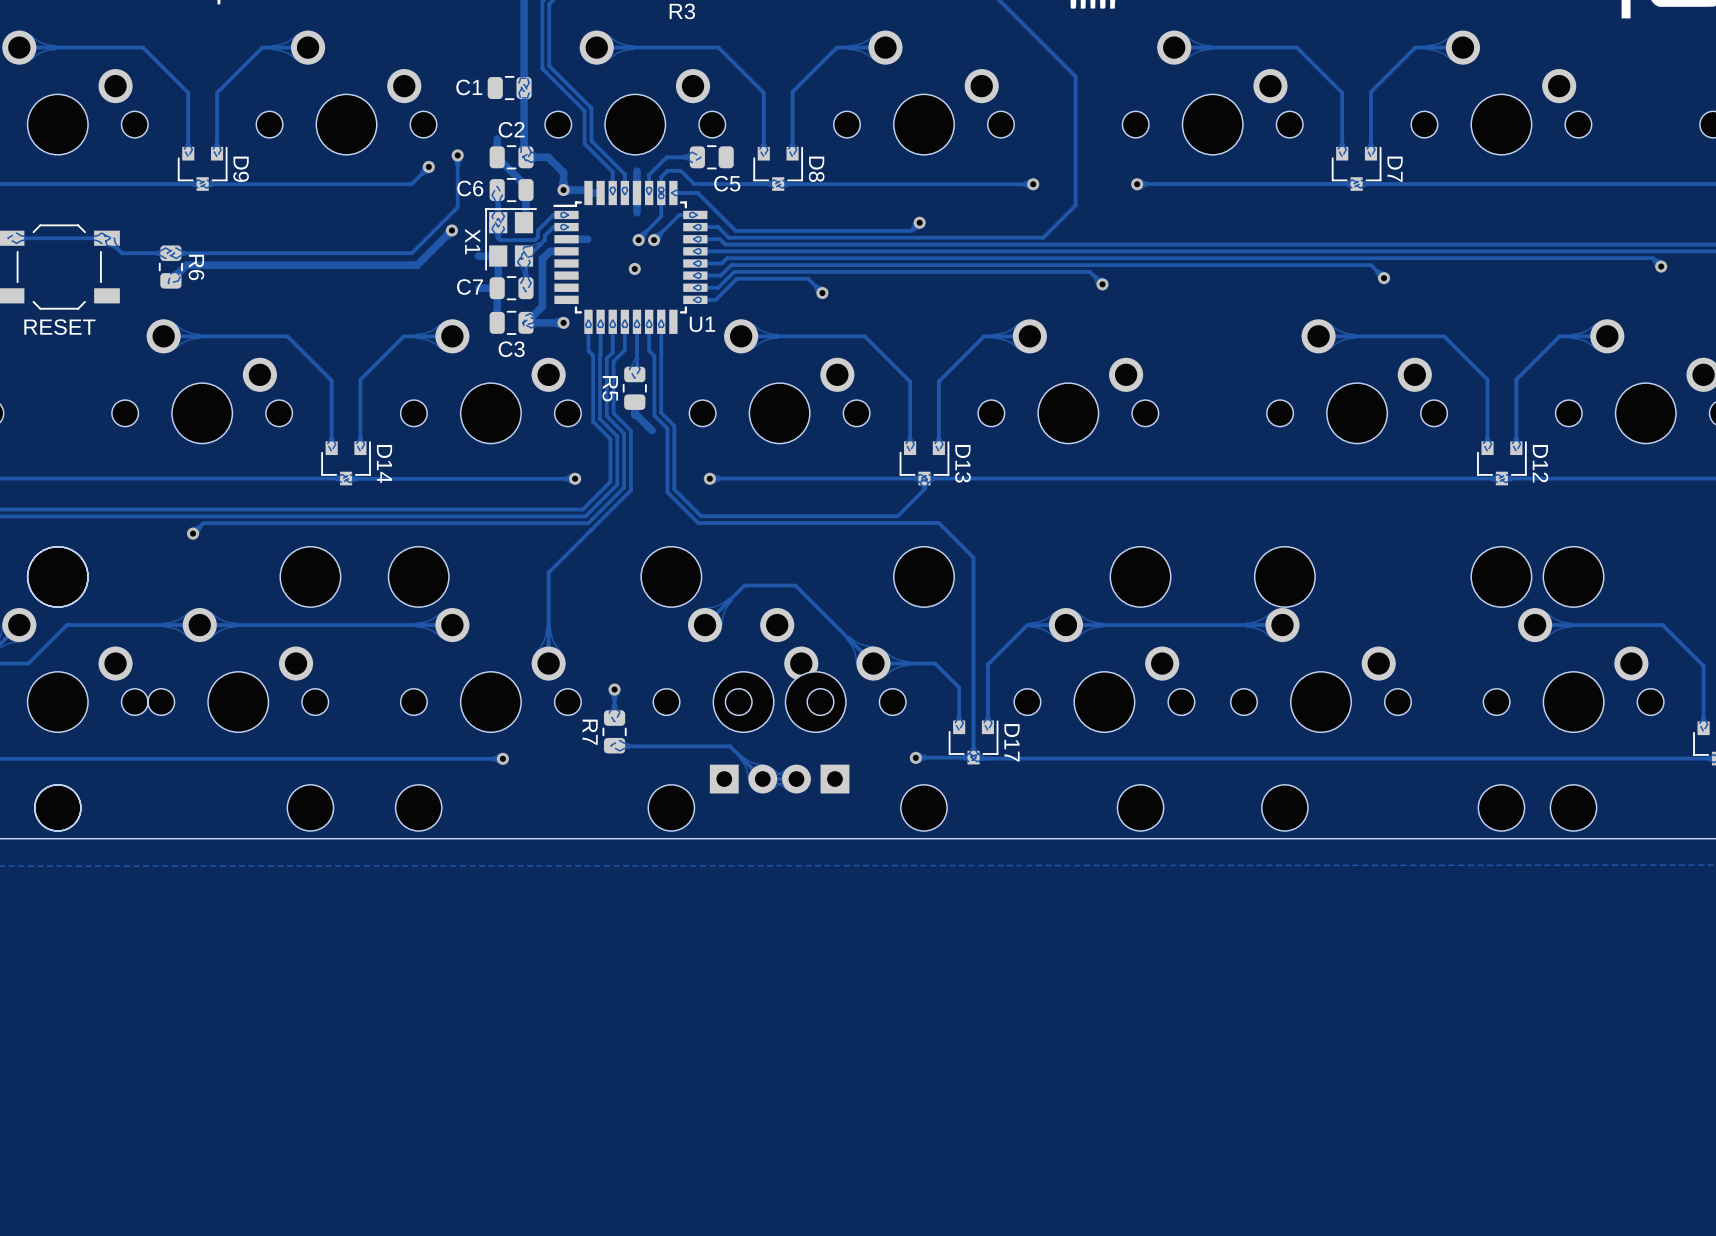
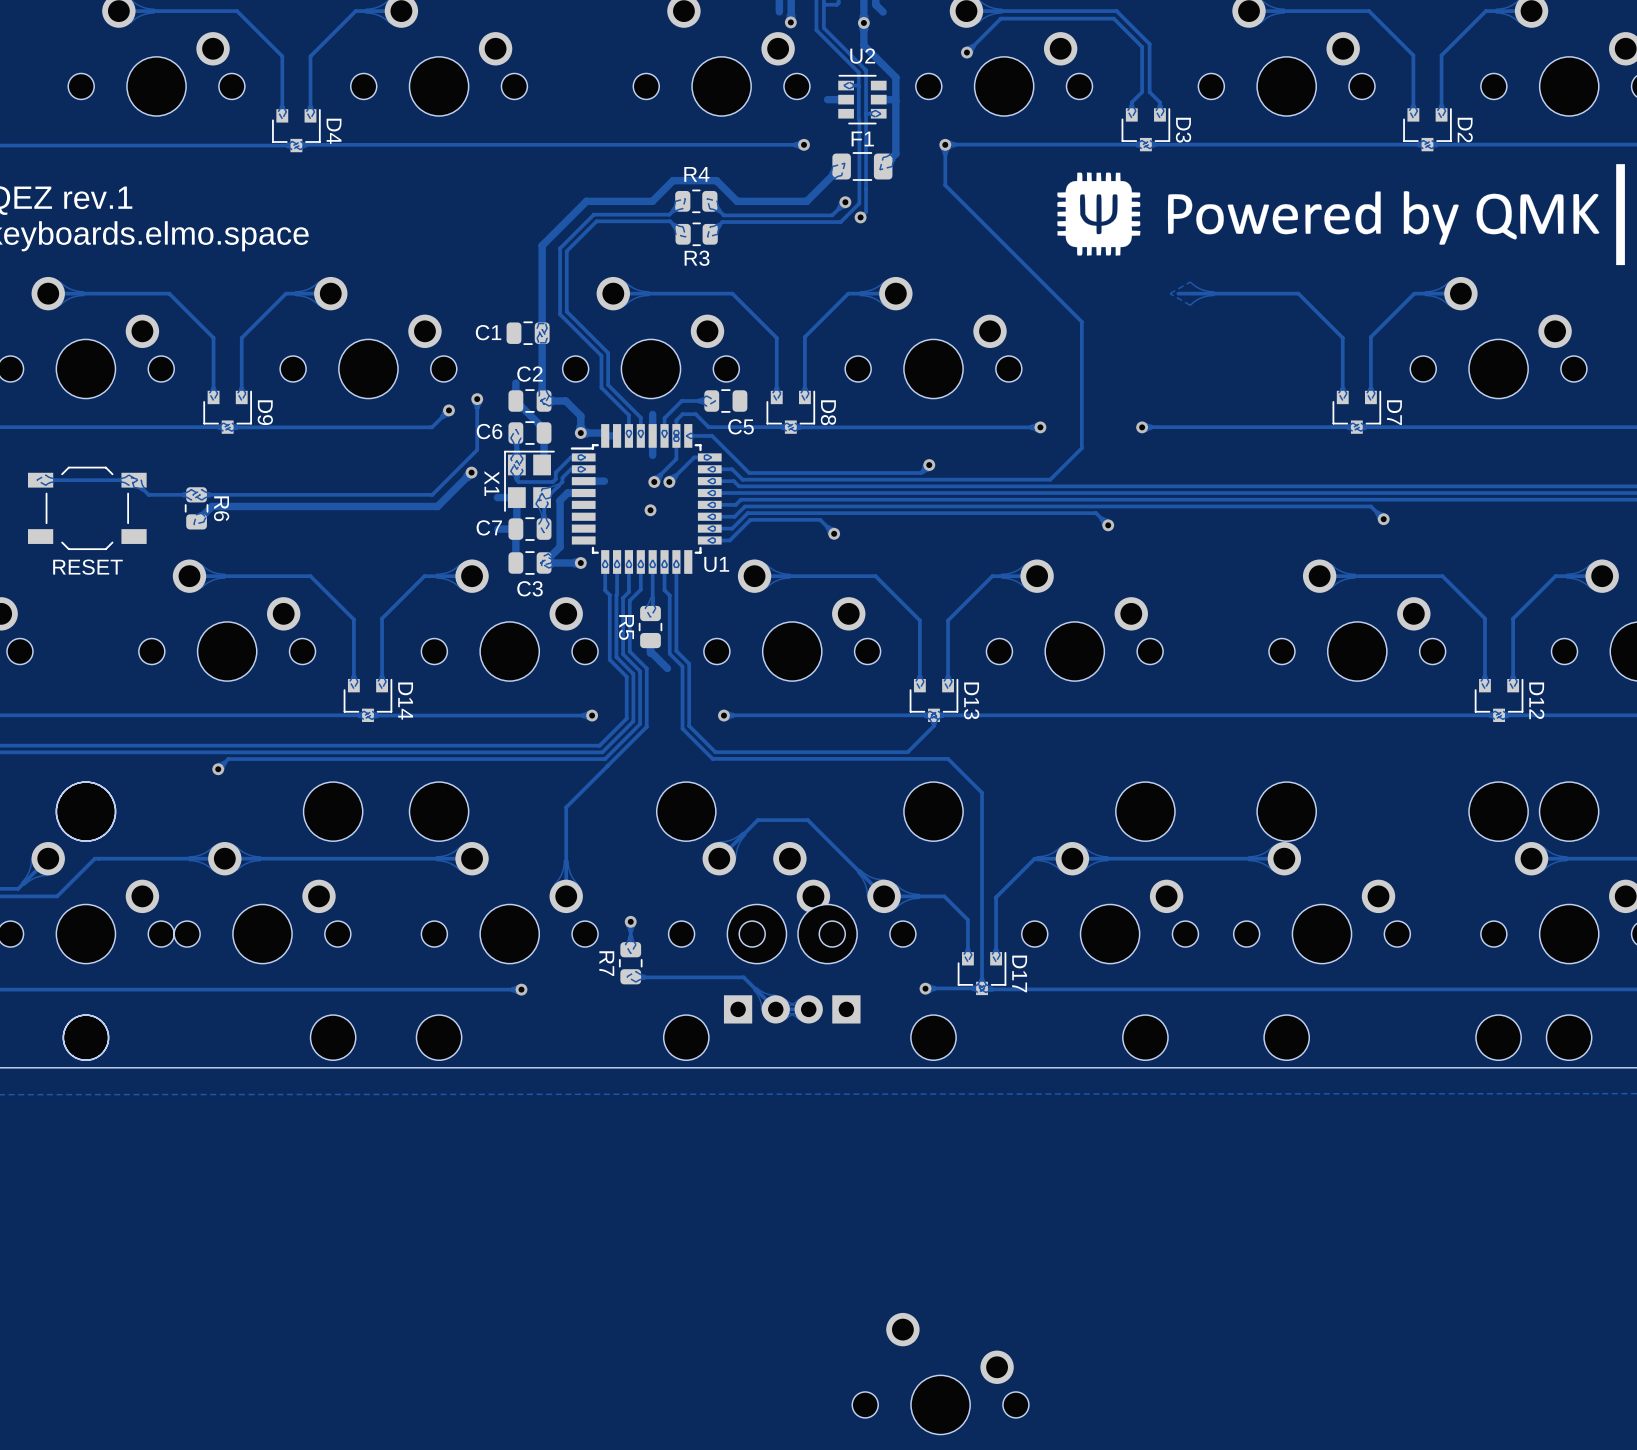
part: (1212, 92) -> none
part: none -> (940, 1373)

